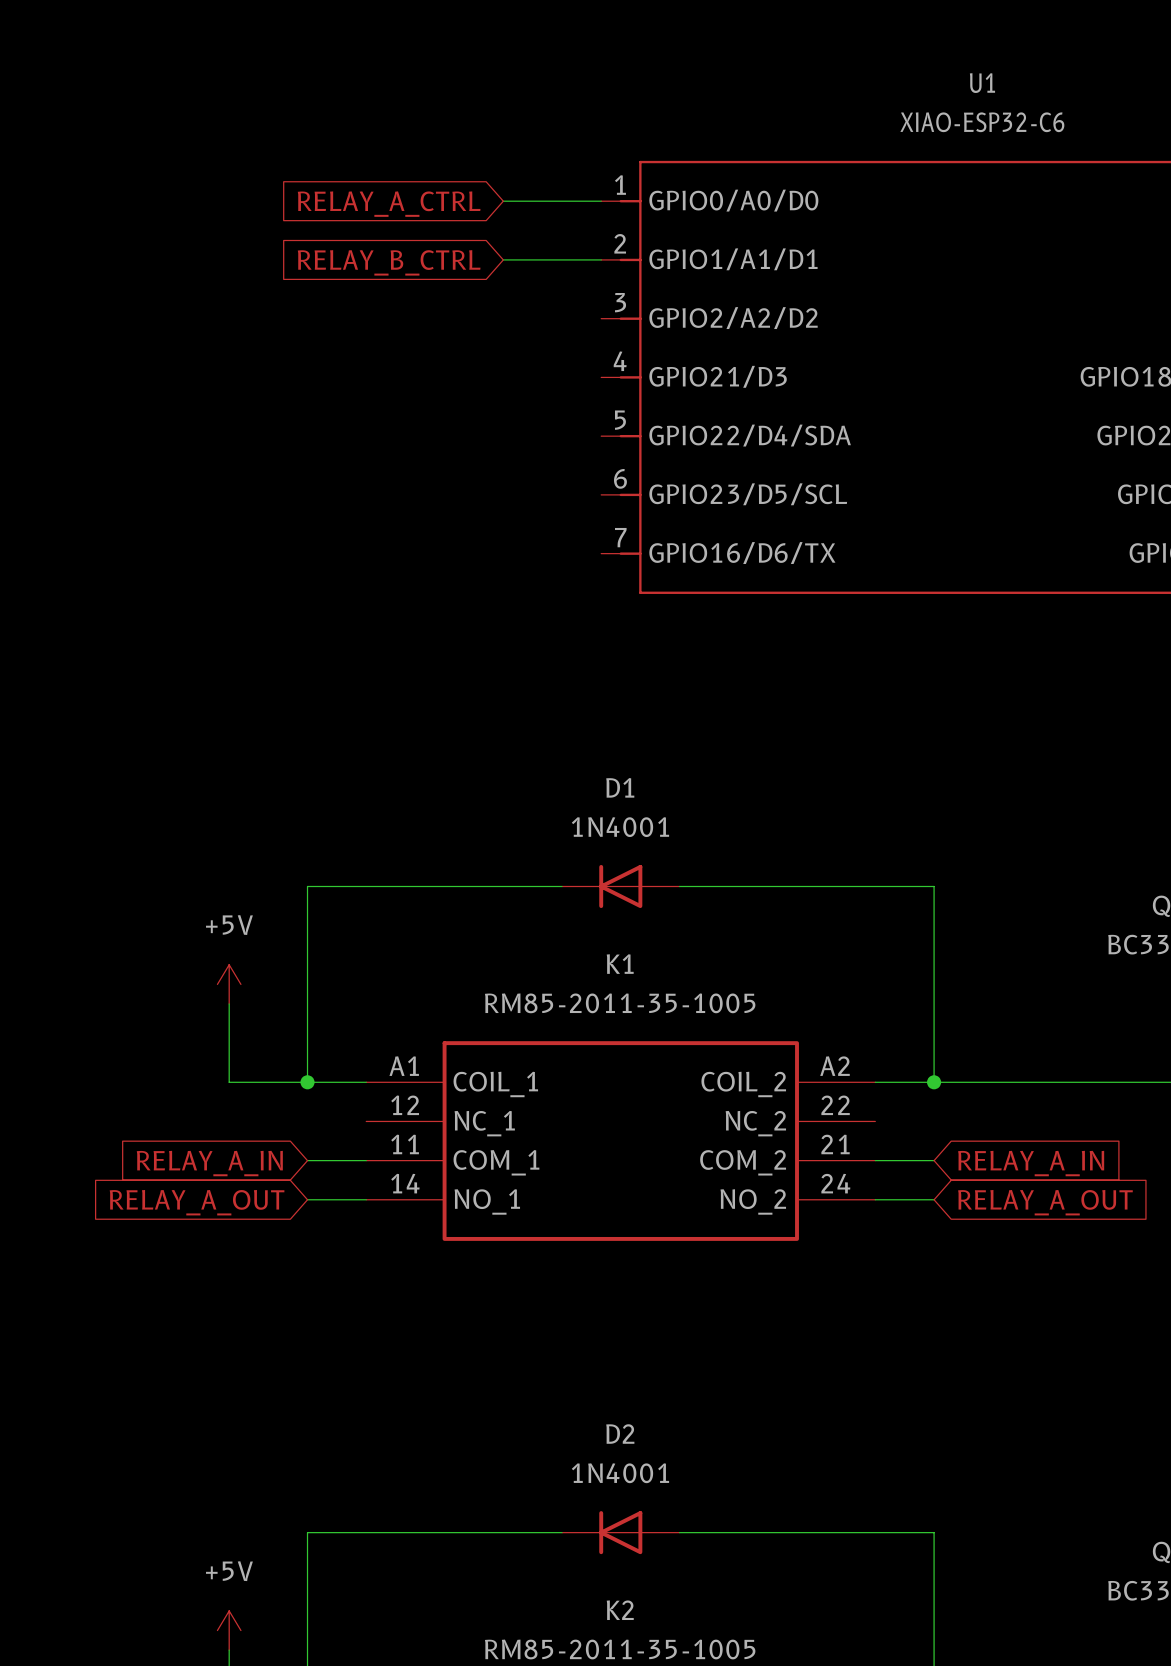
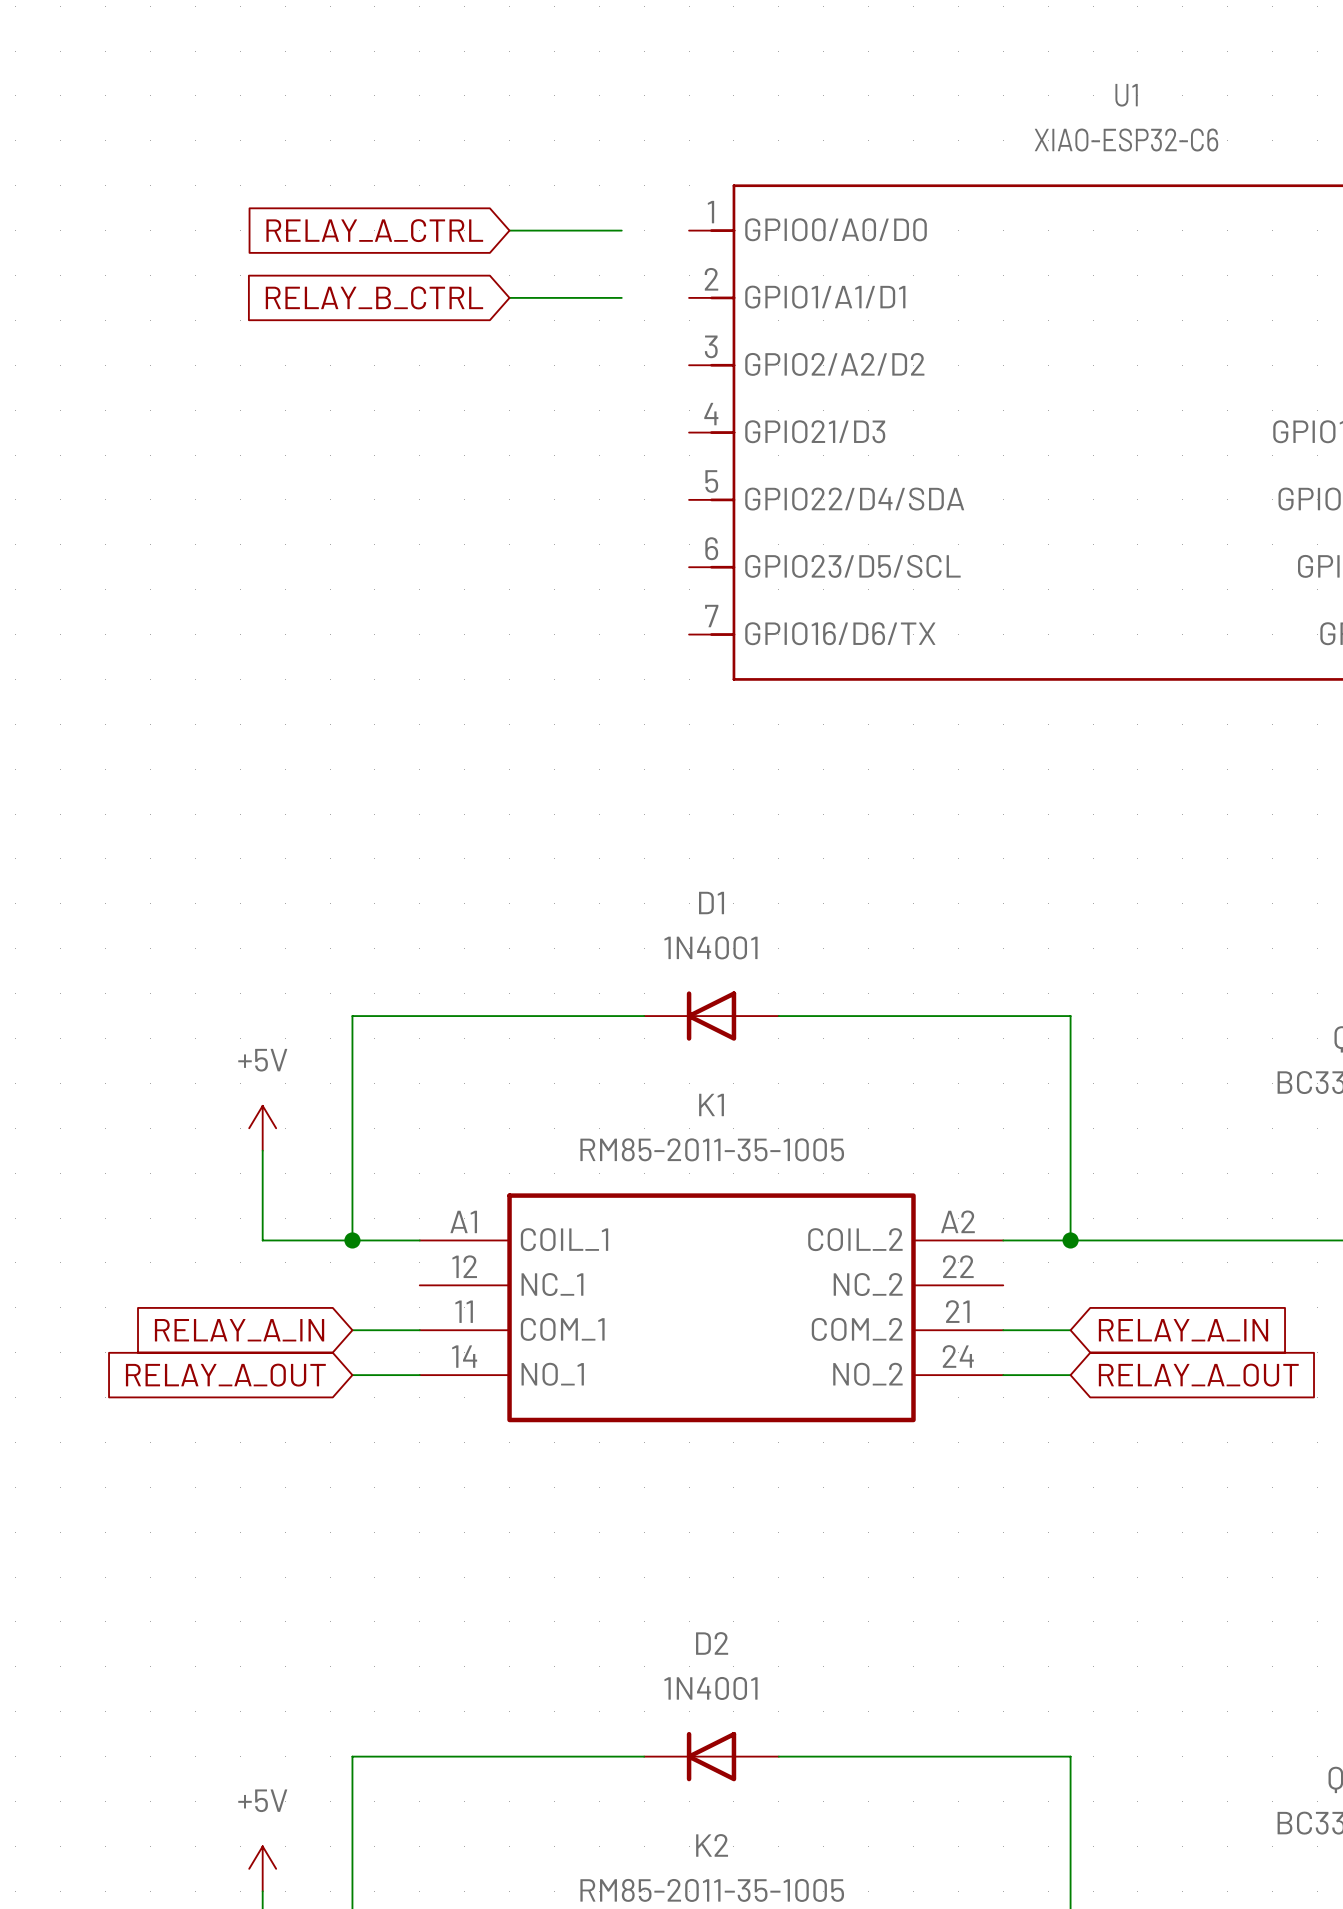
wire: (542, 201) (601, 201) -> (509, 230) (576, 230)
global label position: RELAY_A_CTRL (389, 204) -> RELAY_A_CTRL (374, 230)
wire: (542, 259) (601, 259) -> (509, 297) (576, 297)
global label position: RELAY_B_CTRL (389, 262) -> RELAY_B_CTRL (374, 297)

